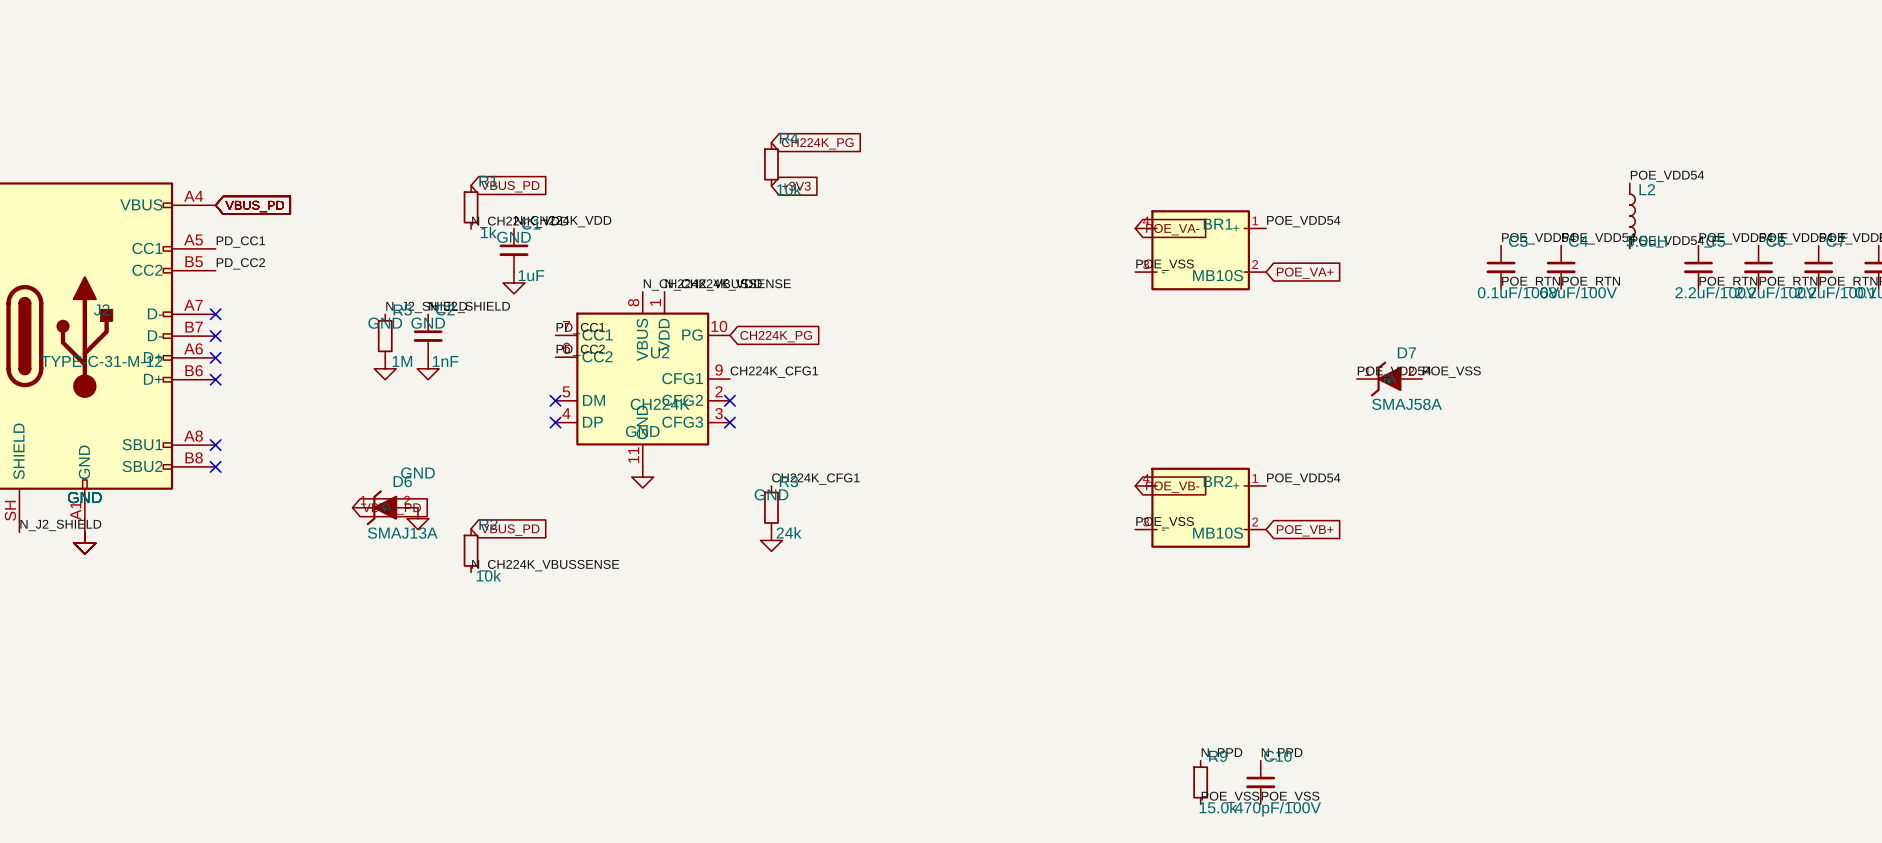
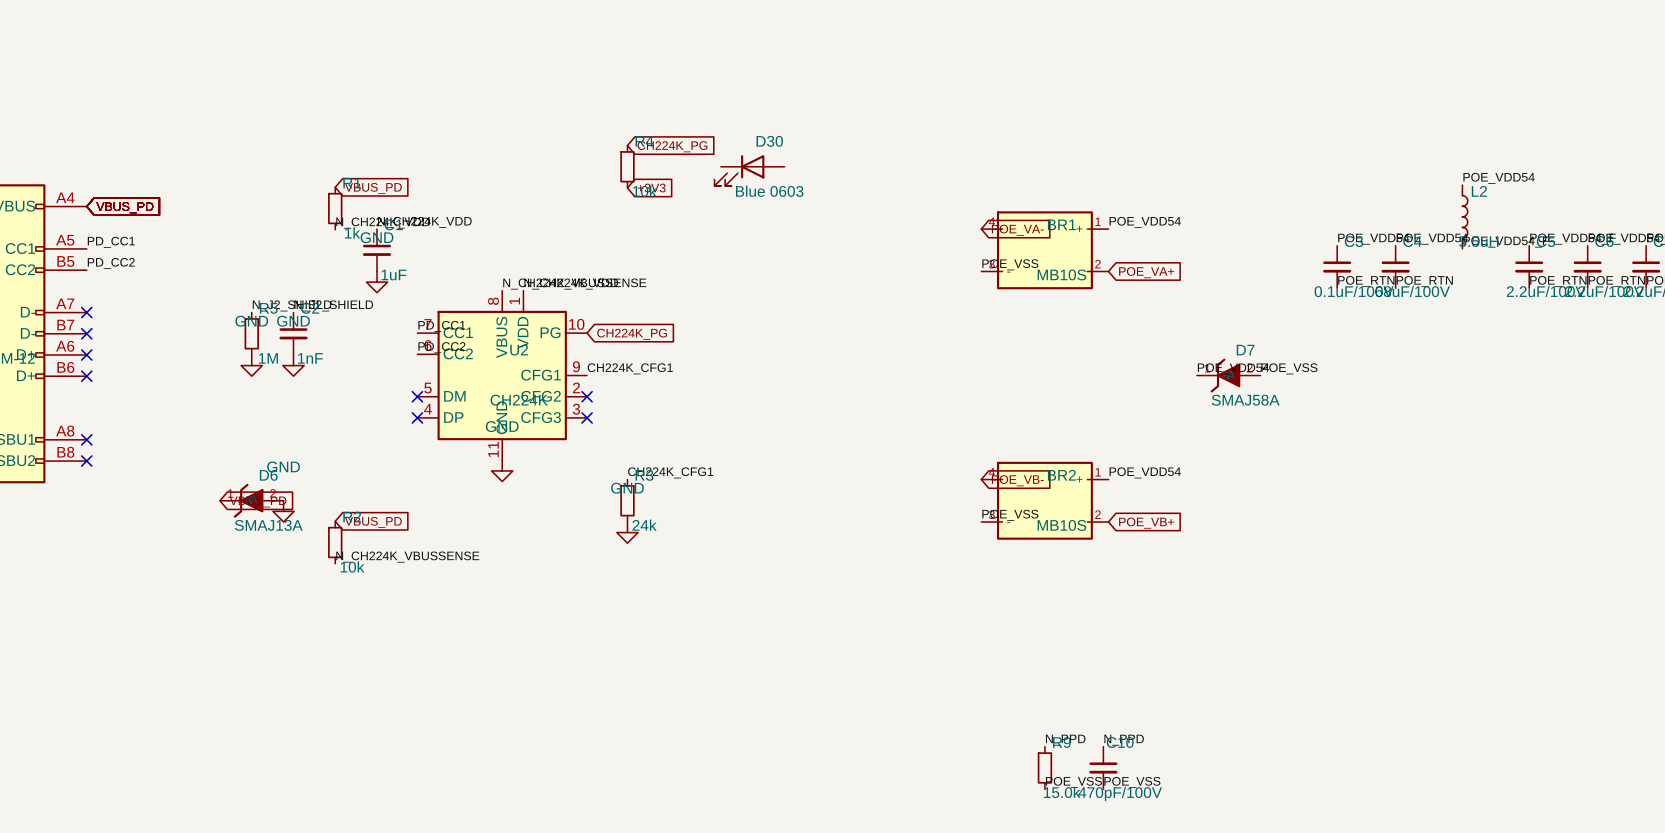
D30: none -> Blue 0603 (749, 170)

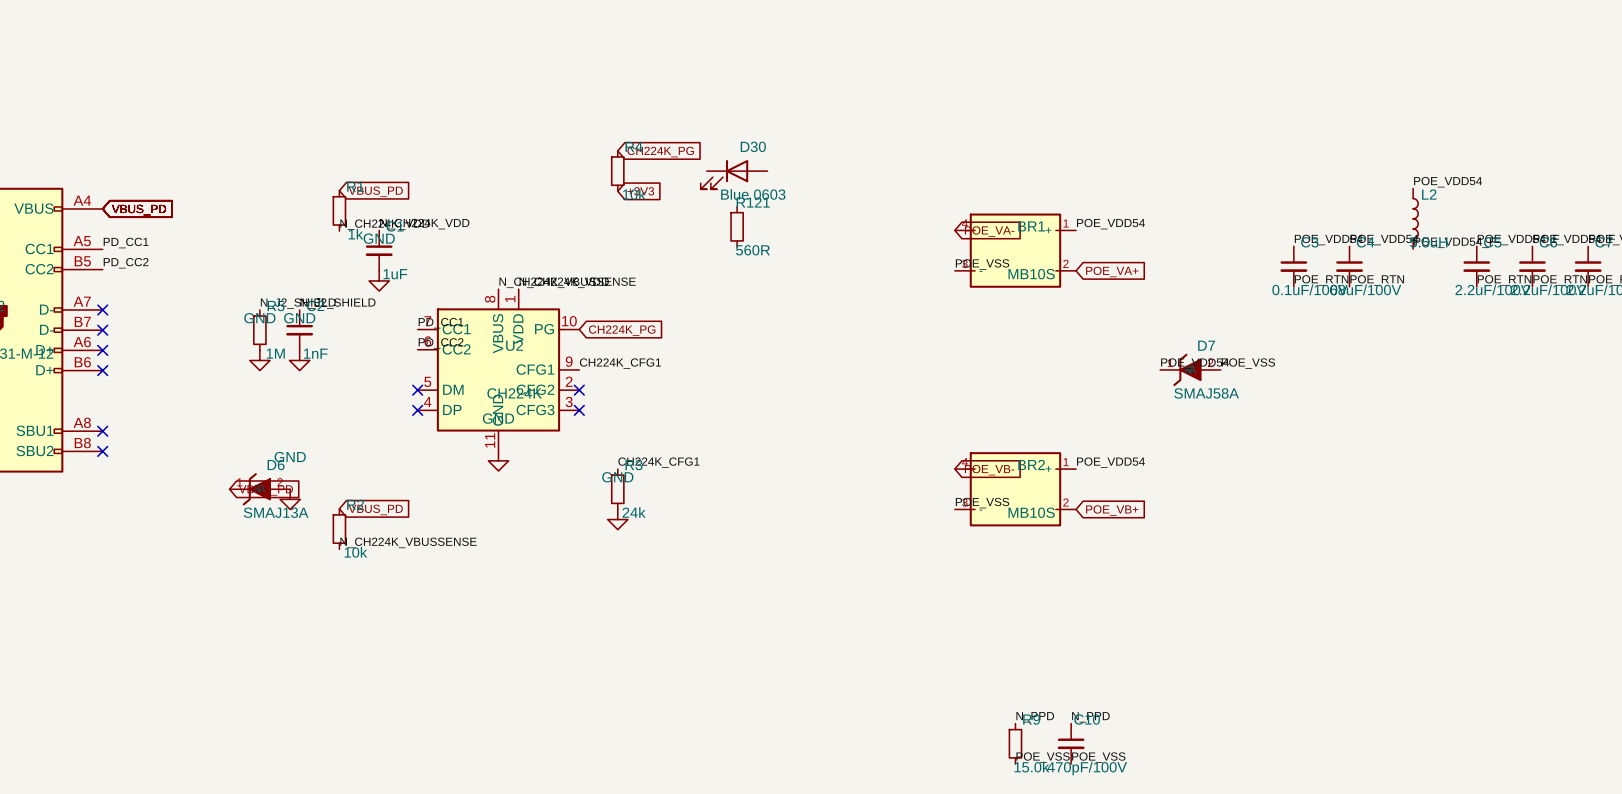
R121: none -> 560R (737, 226)

